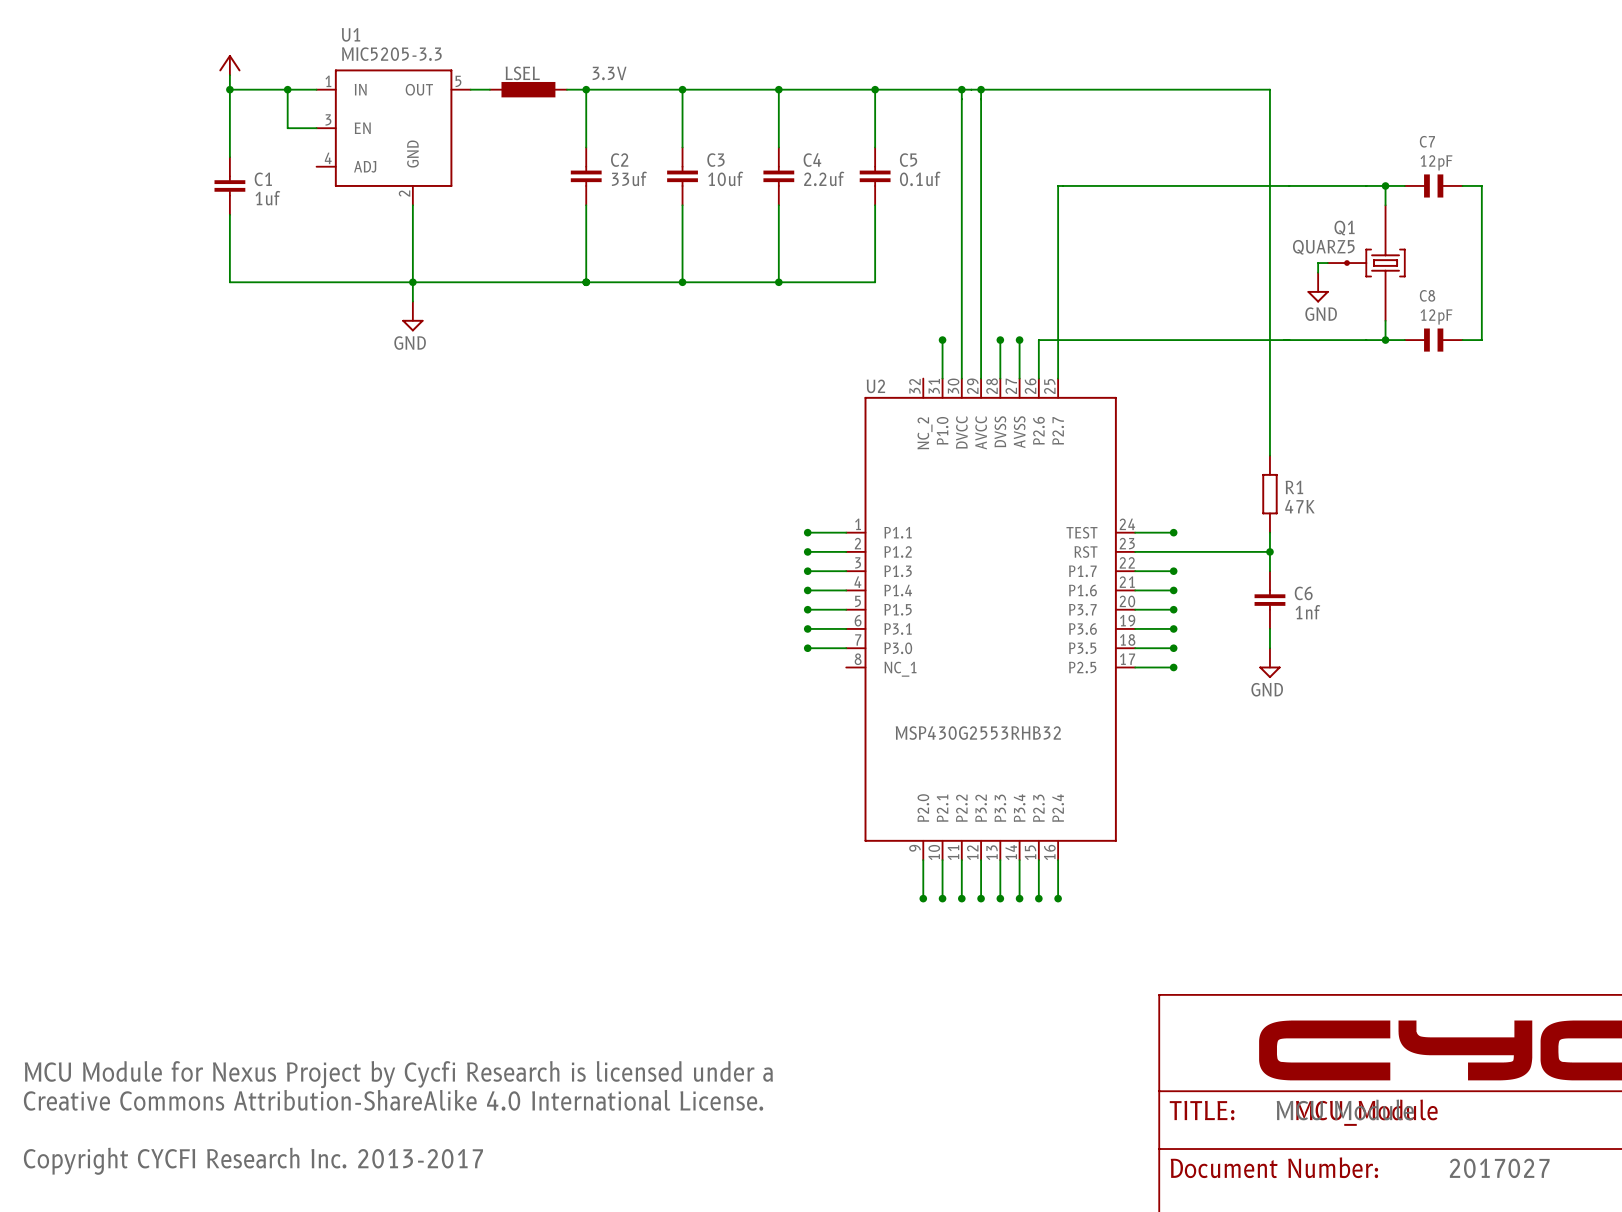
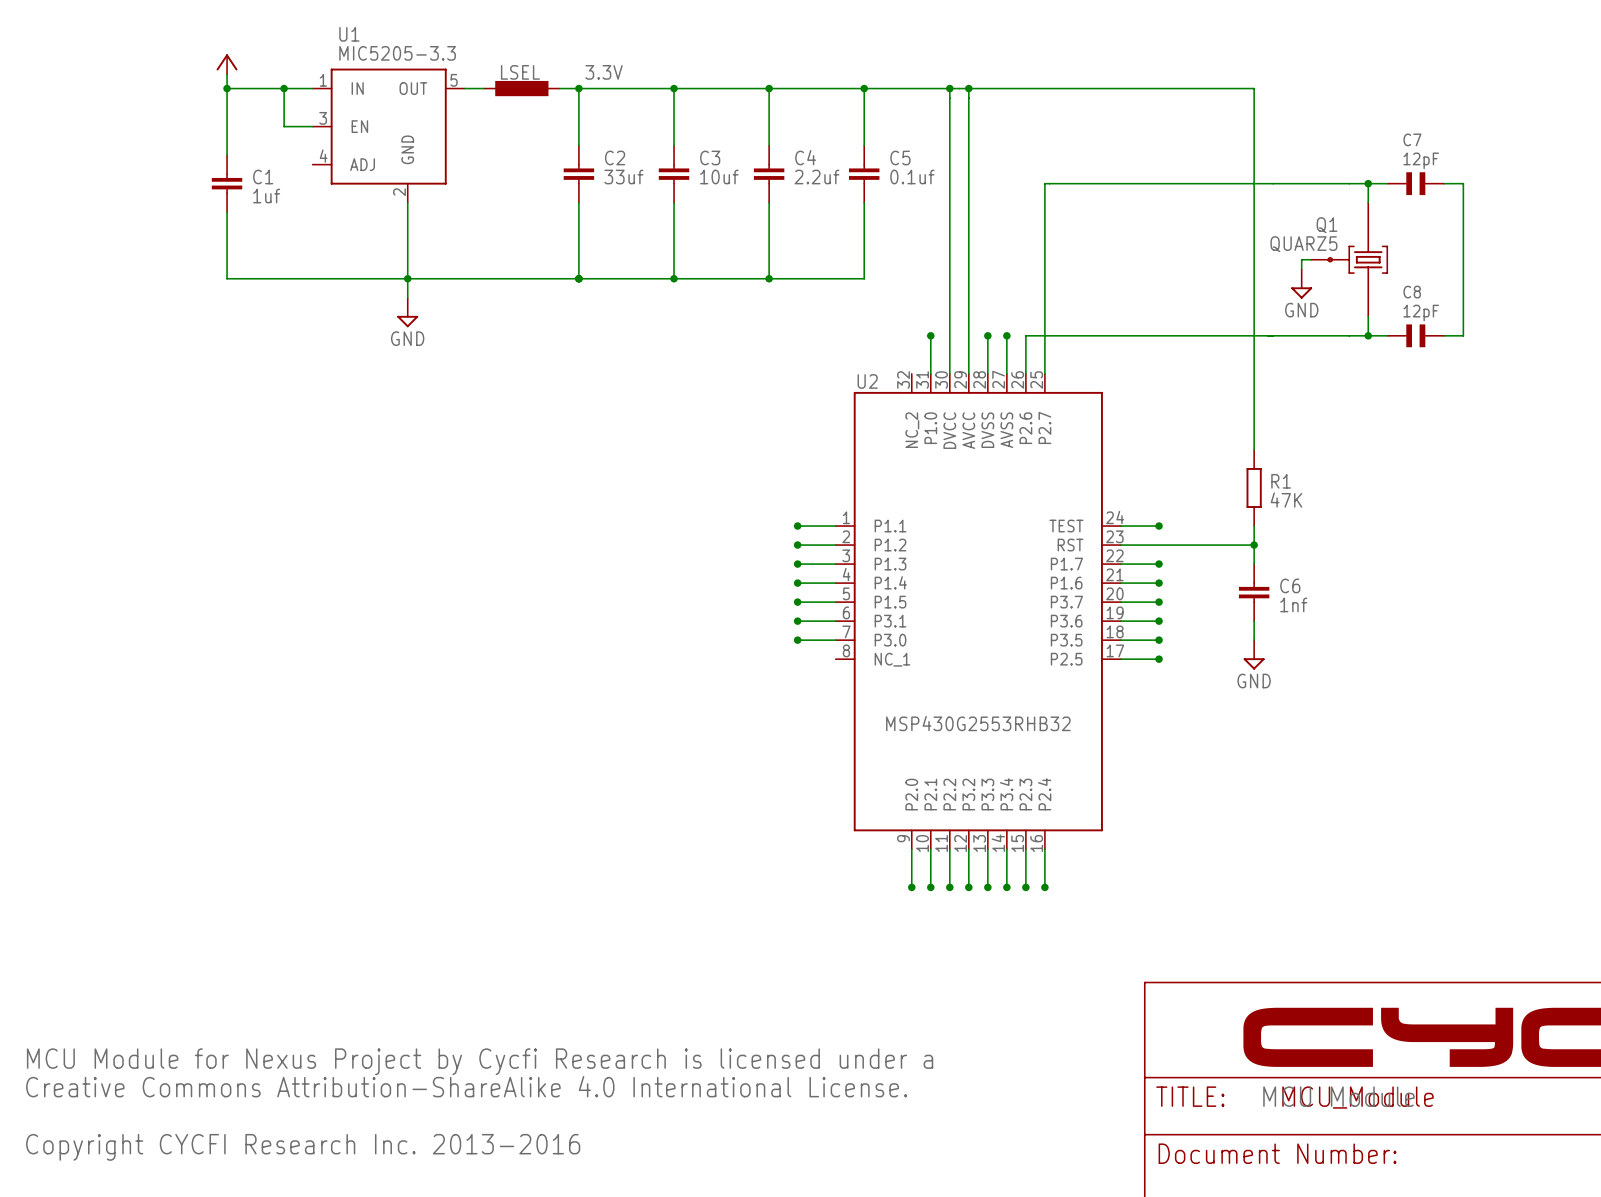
text: Copyright CYCFI Research Inc. 2013-2017 (253, 1161) -> Copyright CYCFI Research Inc. 2013-2016 (303, 1147)
text: 2017027 (1499, 1168) -> none

